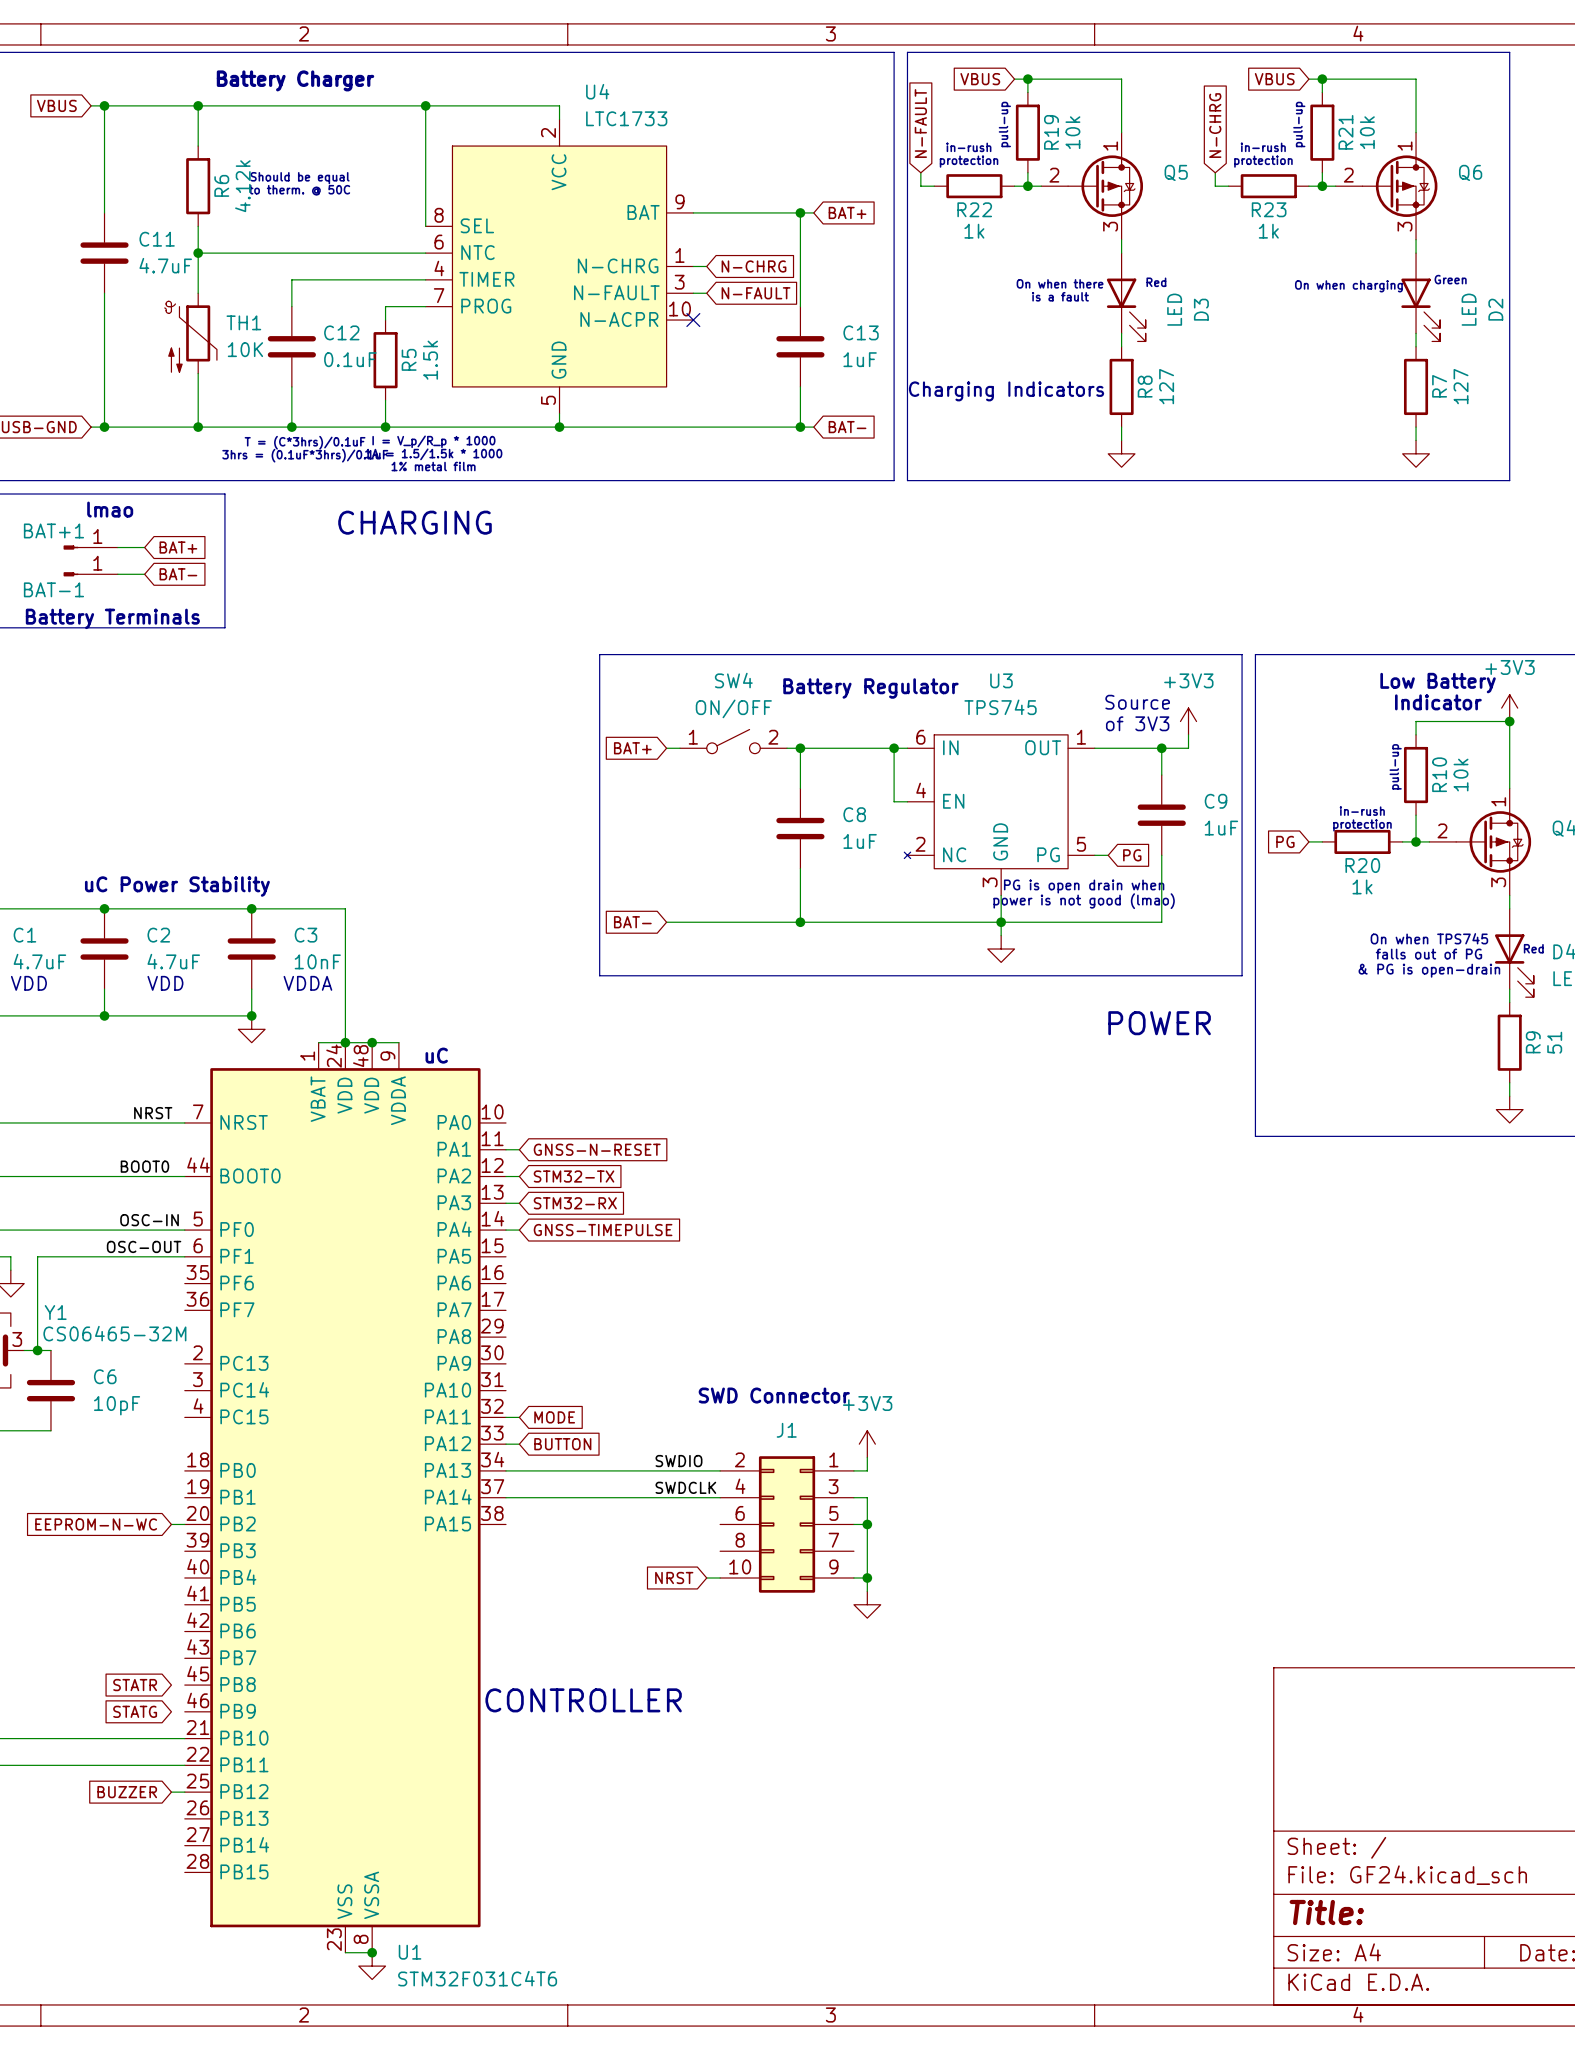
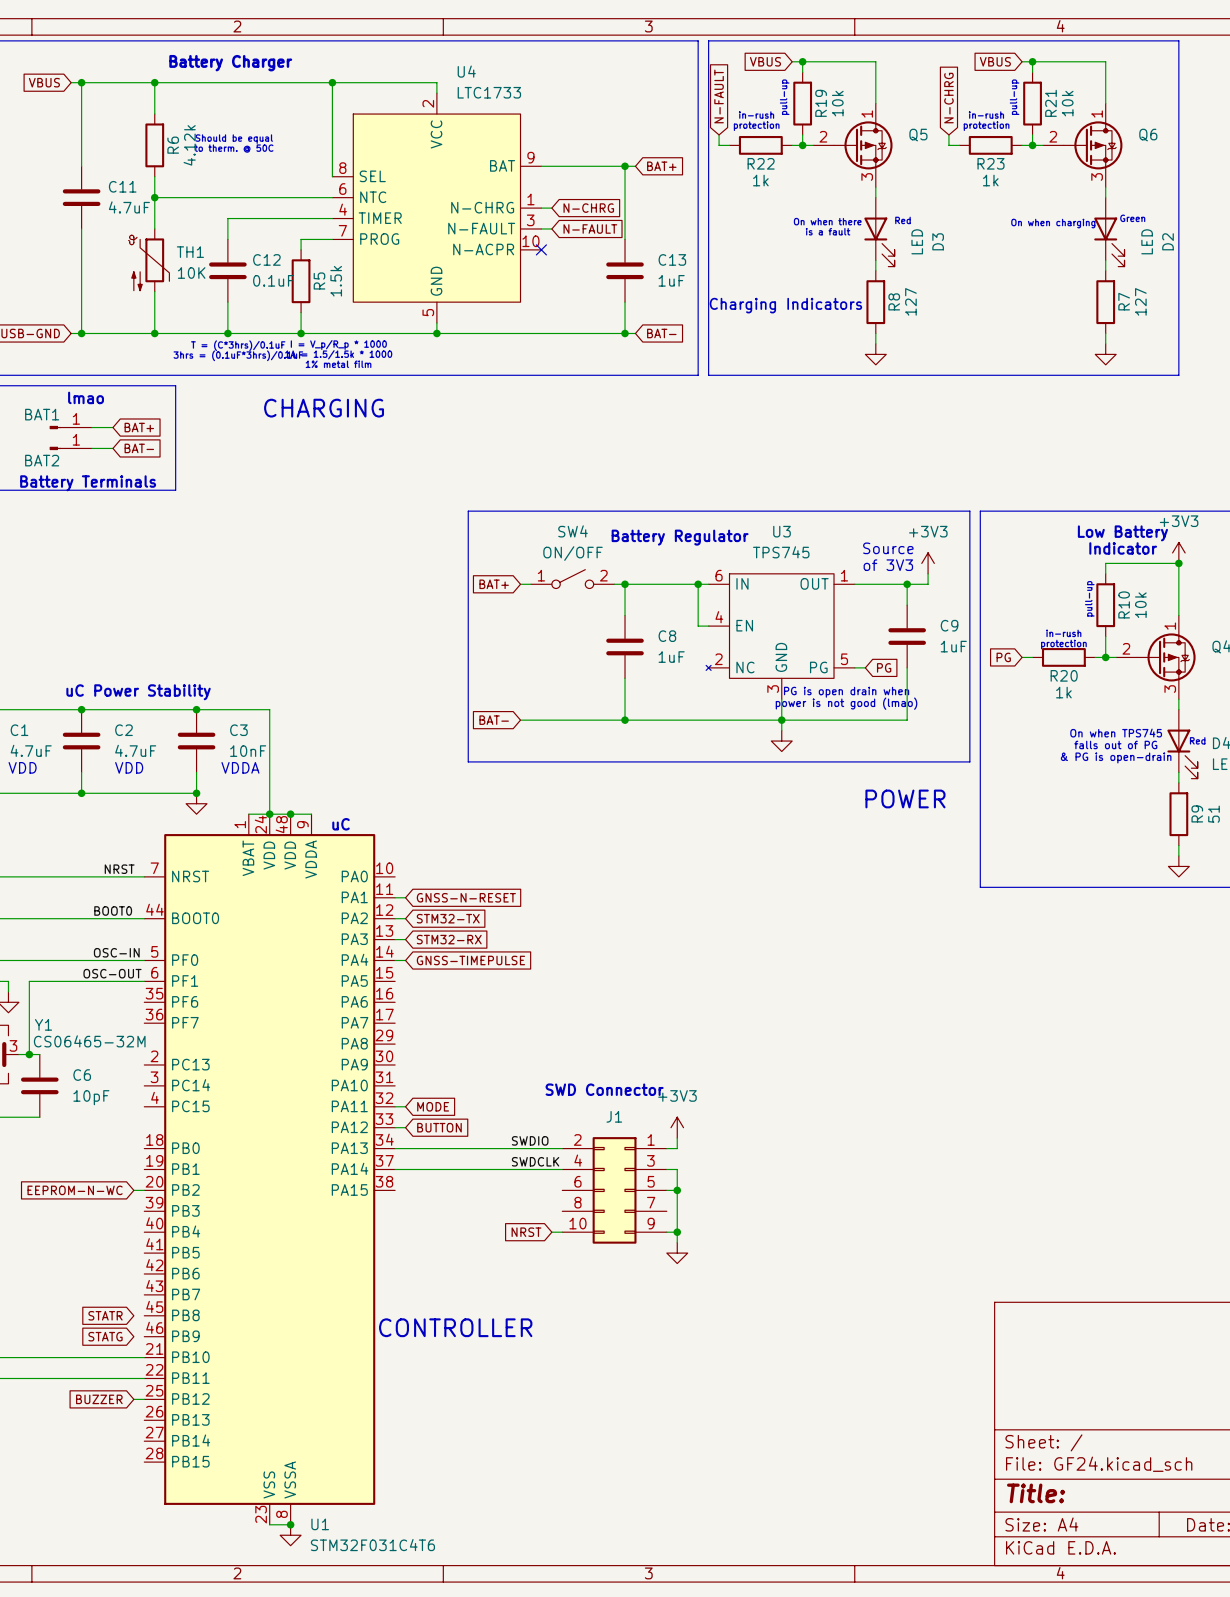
BAT+1 name: BAT+1 (53, 530) -> BAT1 (42, 414)
BAT-1 name: BAT-1 (53, 589) -> BAT2 (42, 460)

